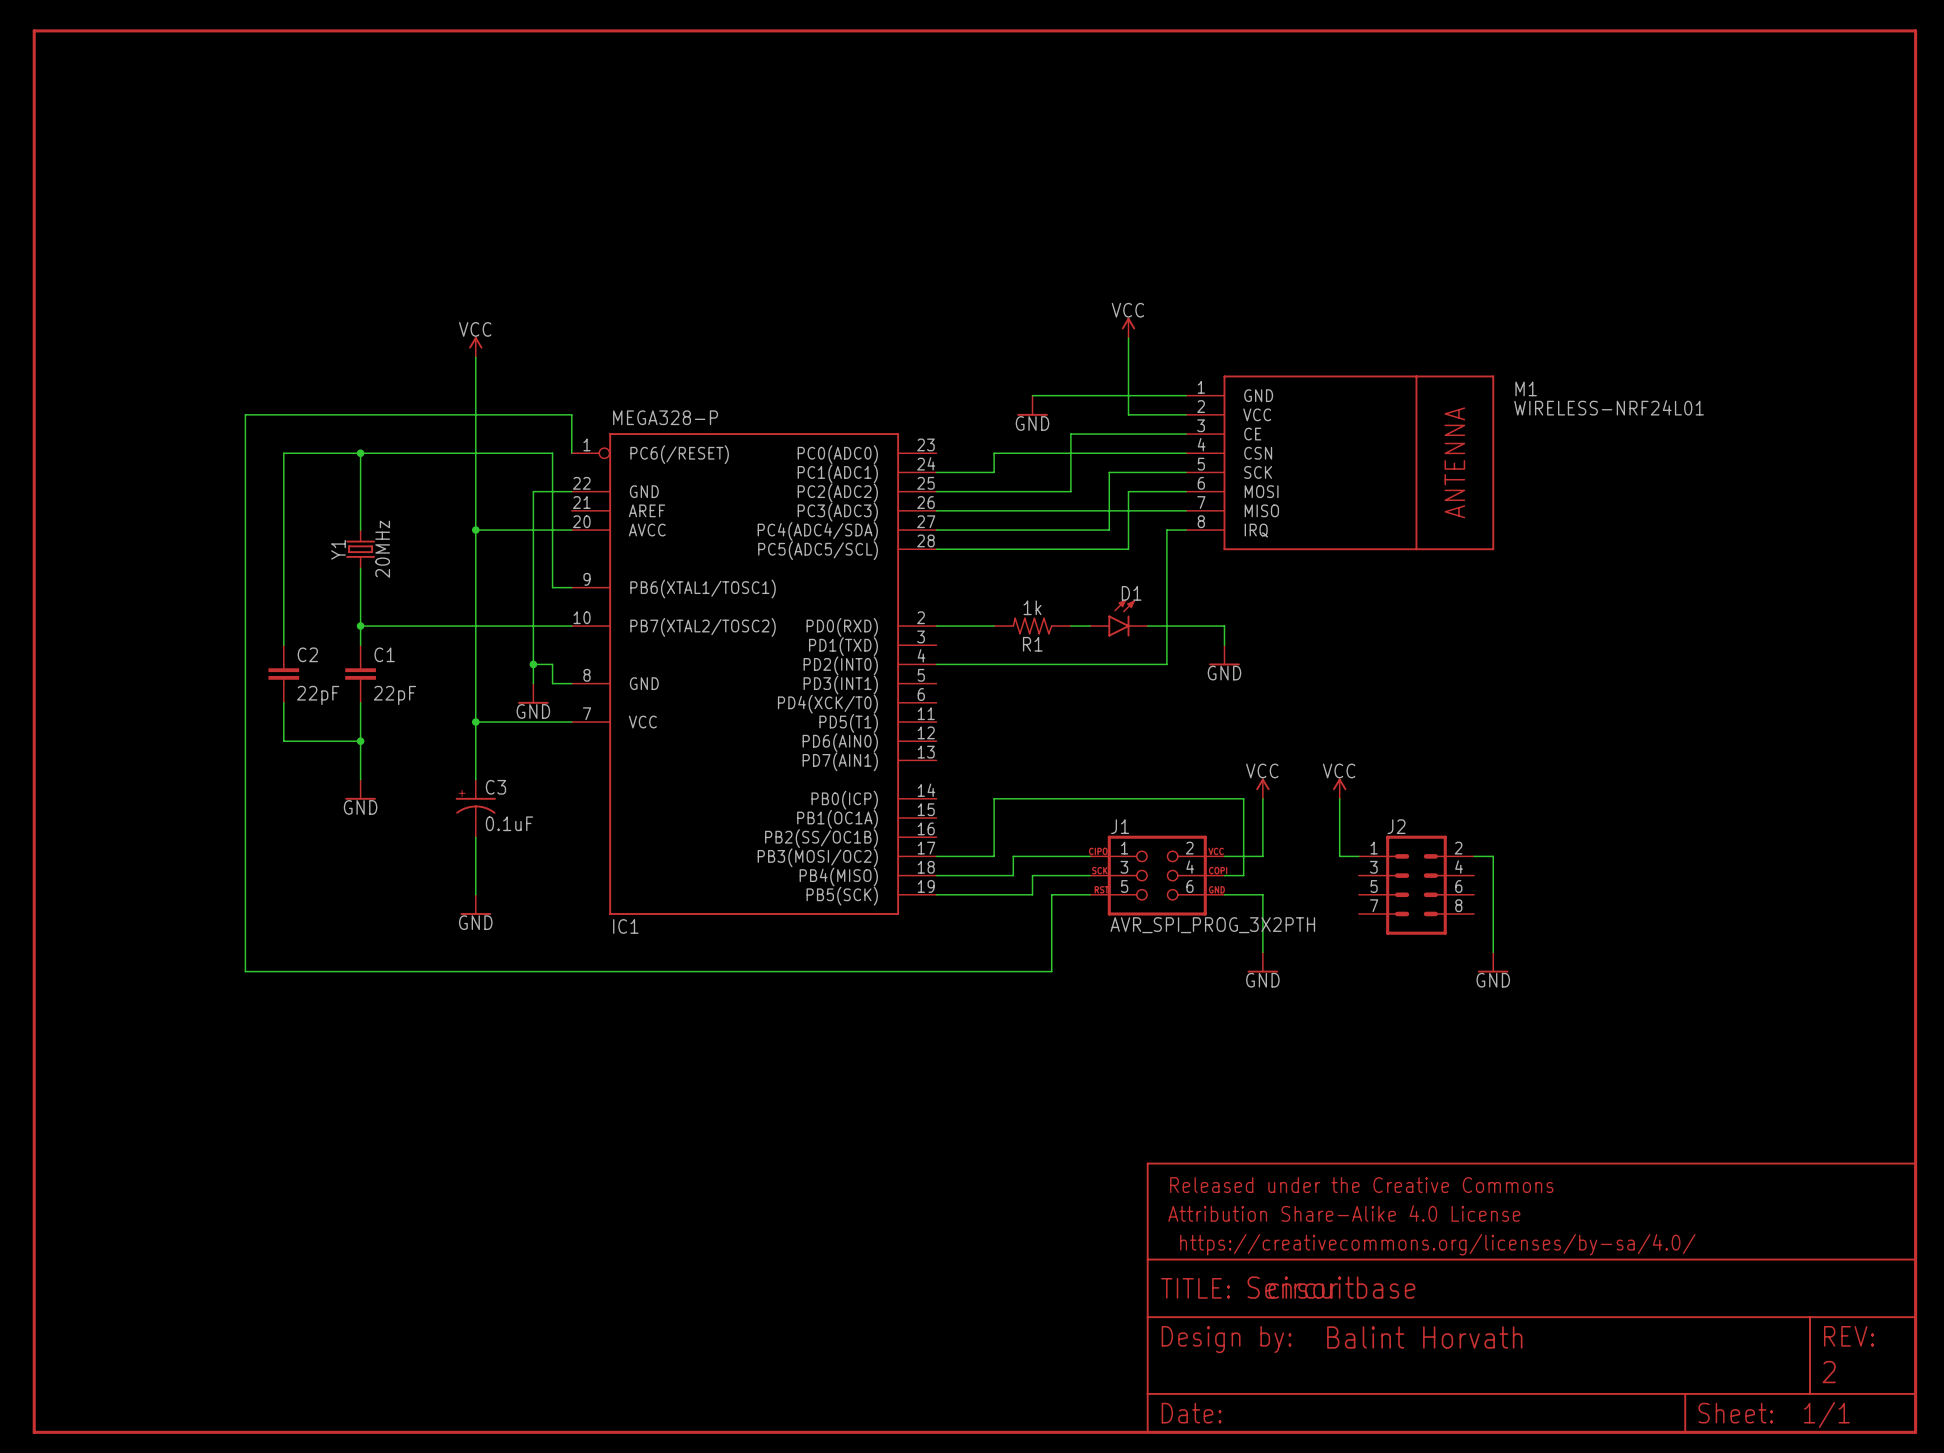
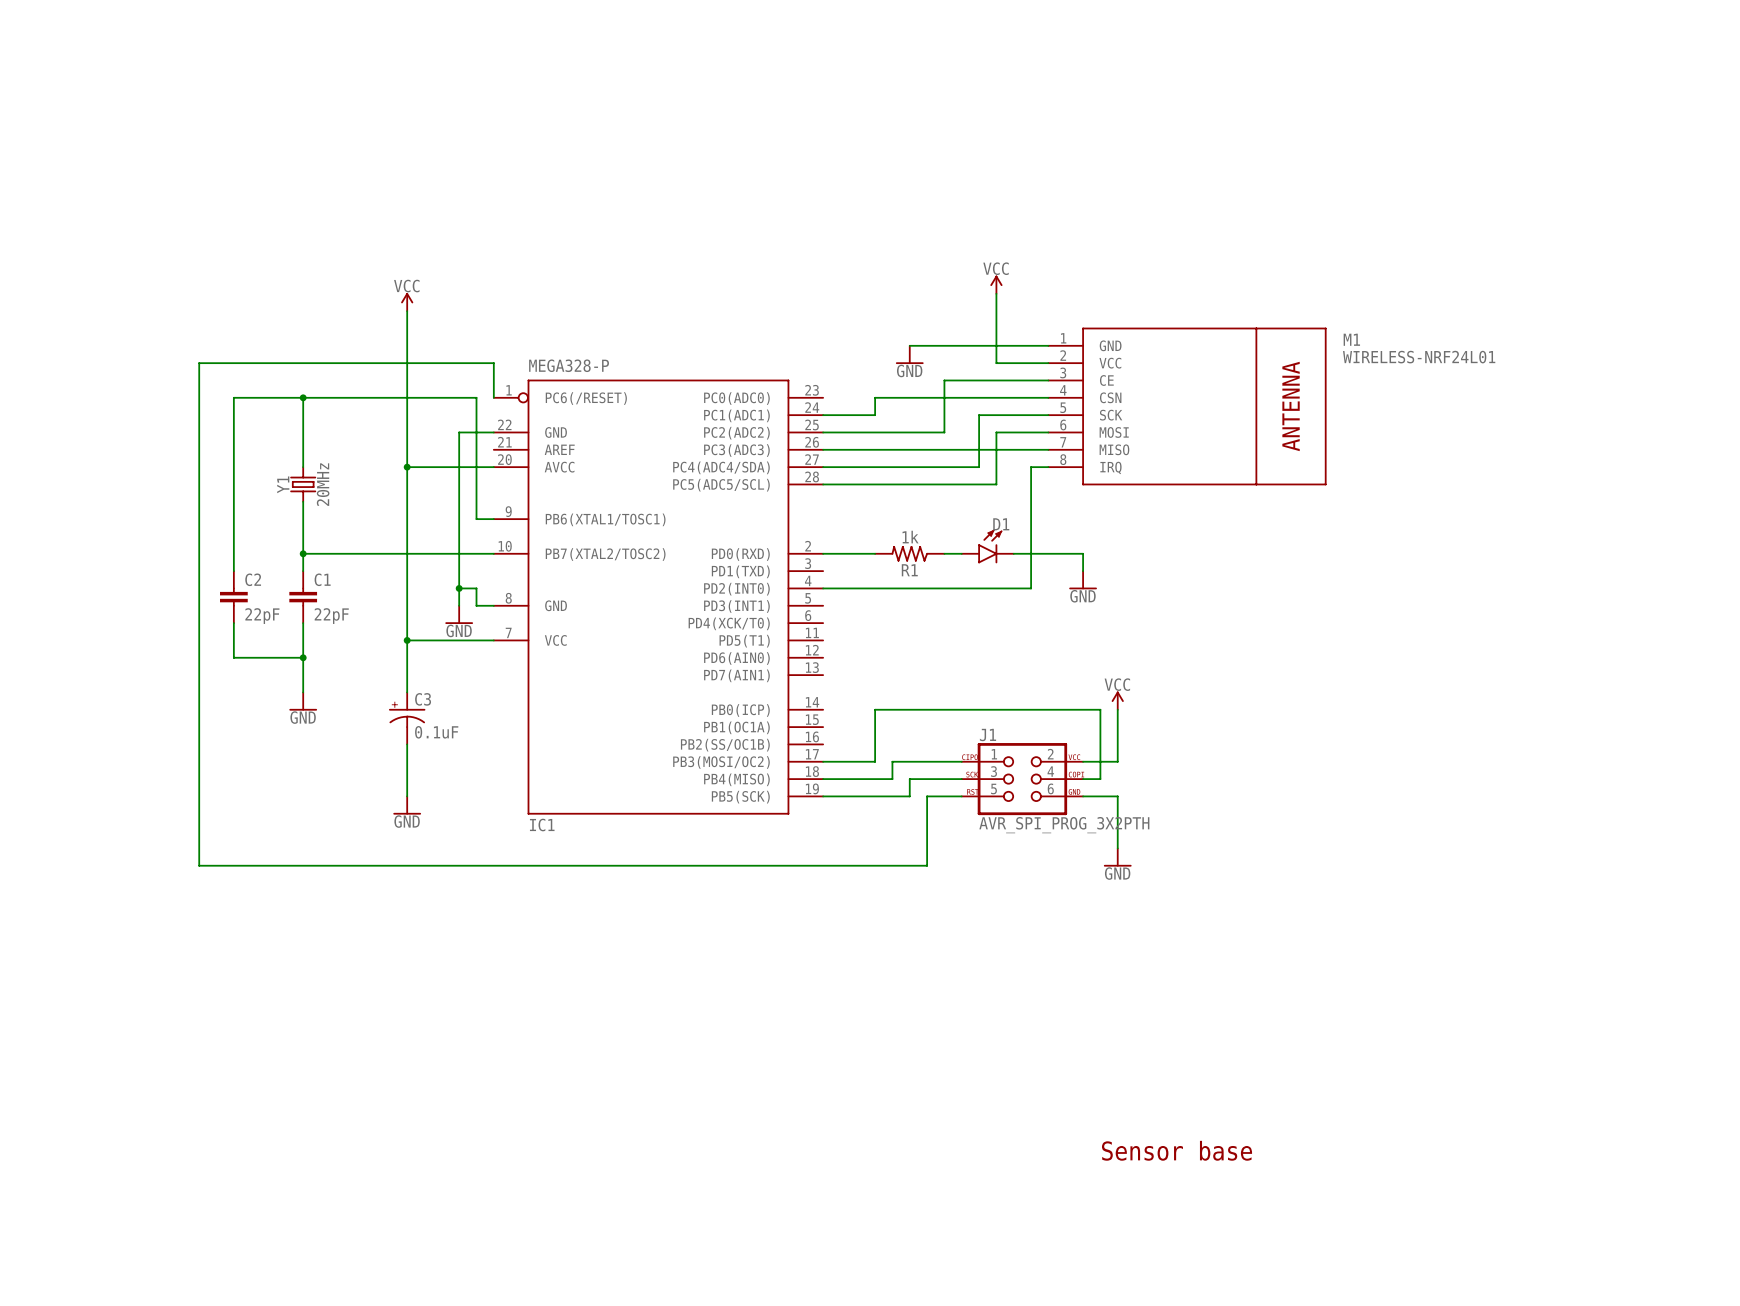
part: (974, 731) -> none
power symbol: VCC (1339, 788) -> none
wire: (1339, 798) (1339, 856) (1358, 856) -> none
wire: (1474, 856) (1493, 856) (1493, 952) -> none
J2: (1416, 885) -> none
power symbol: GND (1493, 962) -> none
part: (1531, 1297) -> none

